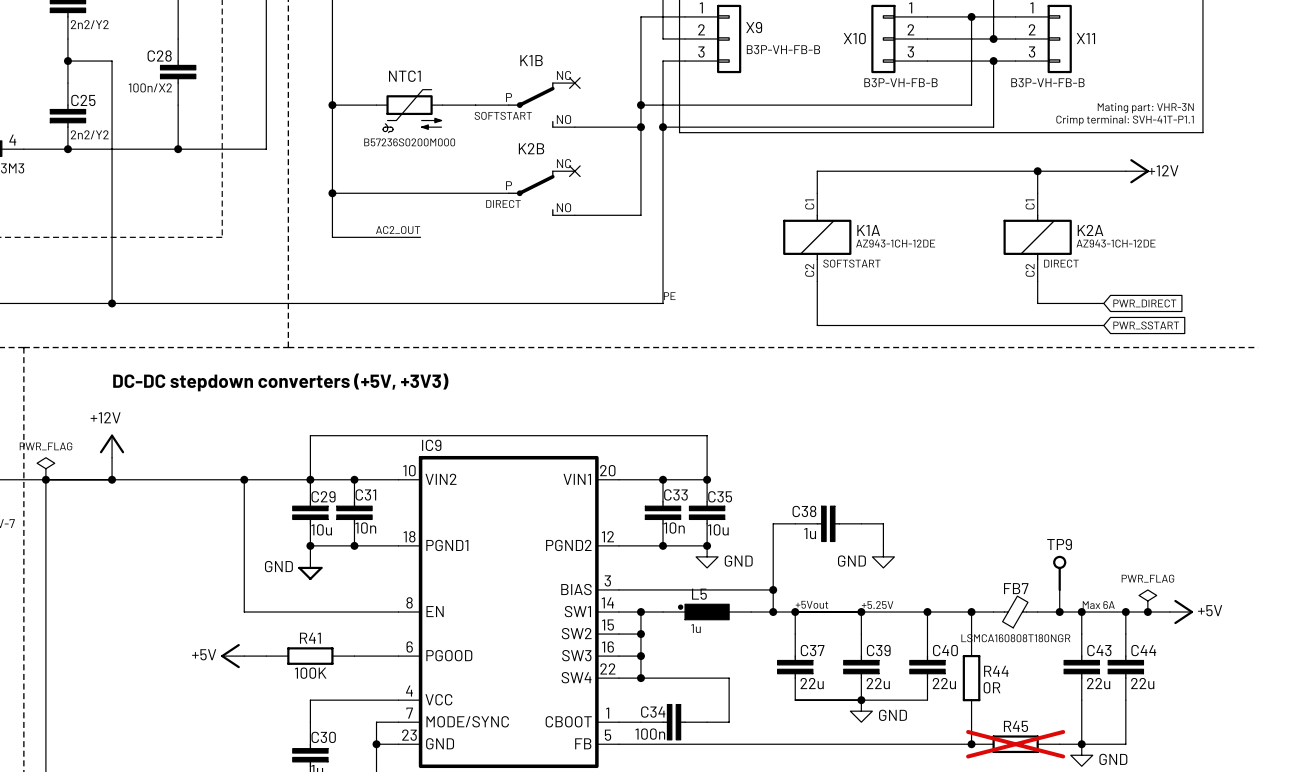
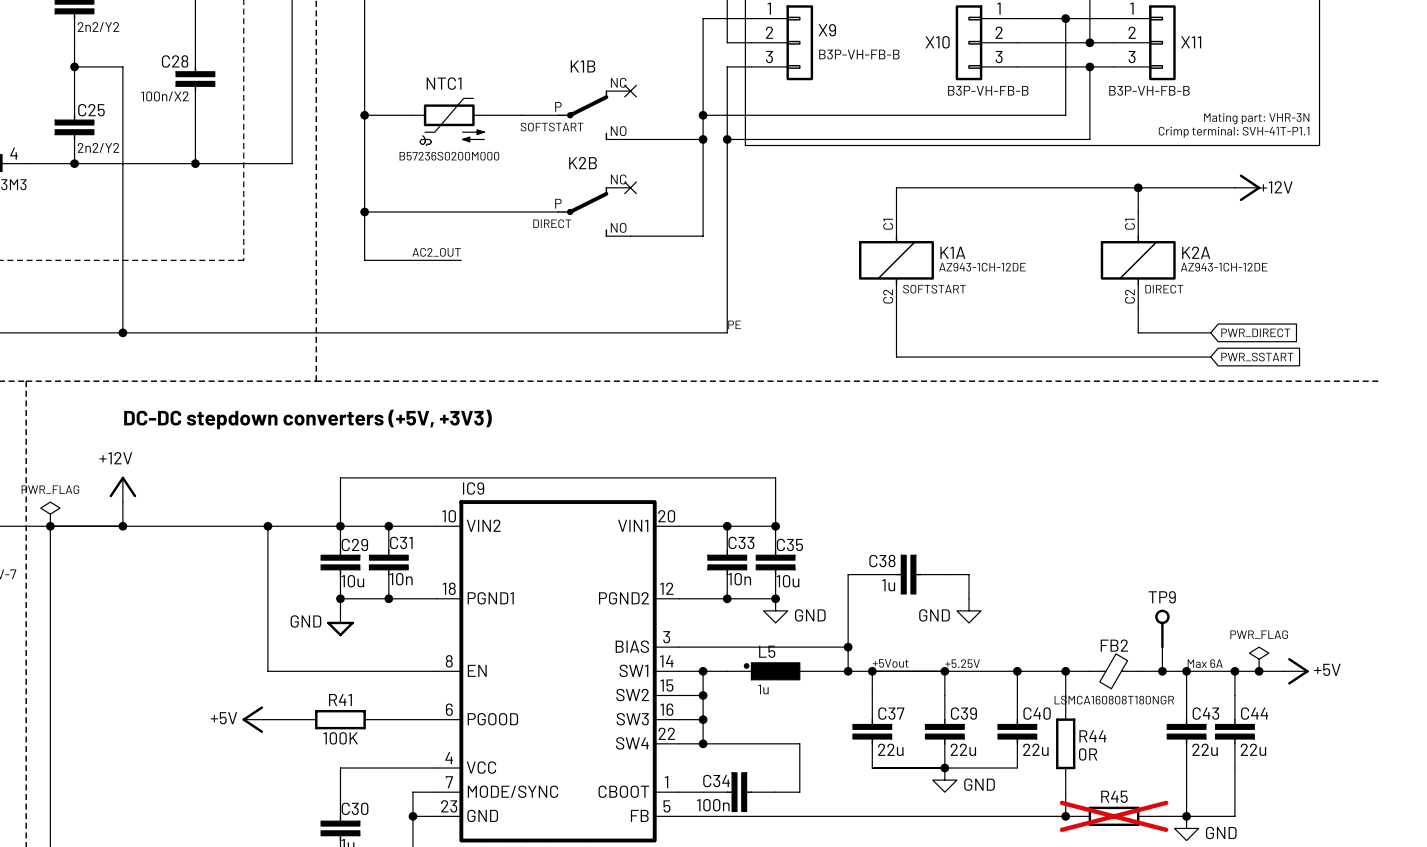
FB7 name: FB7 (1016, 588) -> FB2 (1114, 645)

